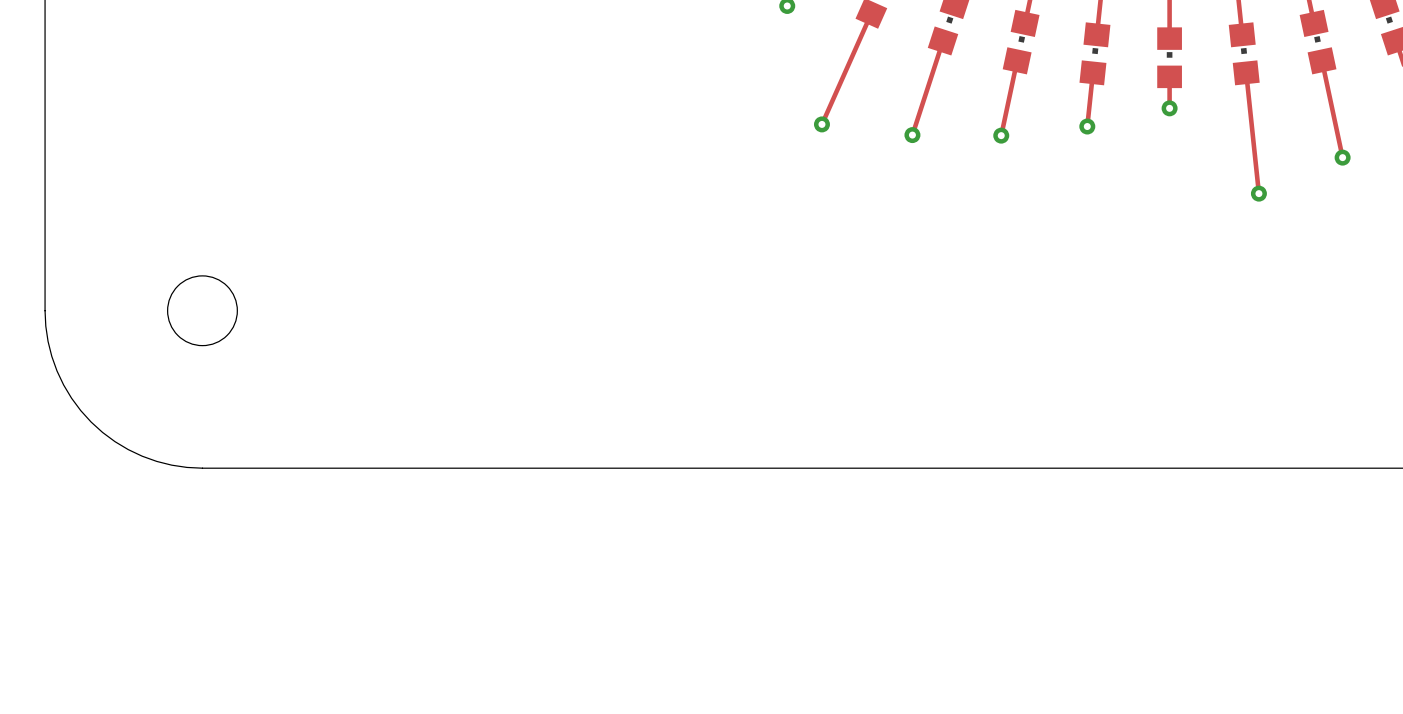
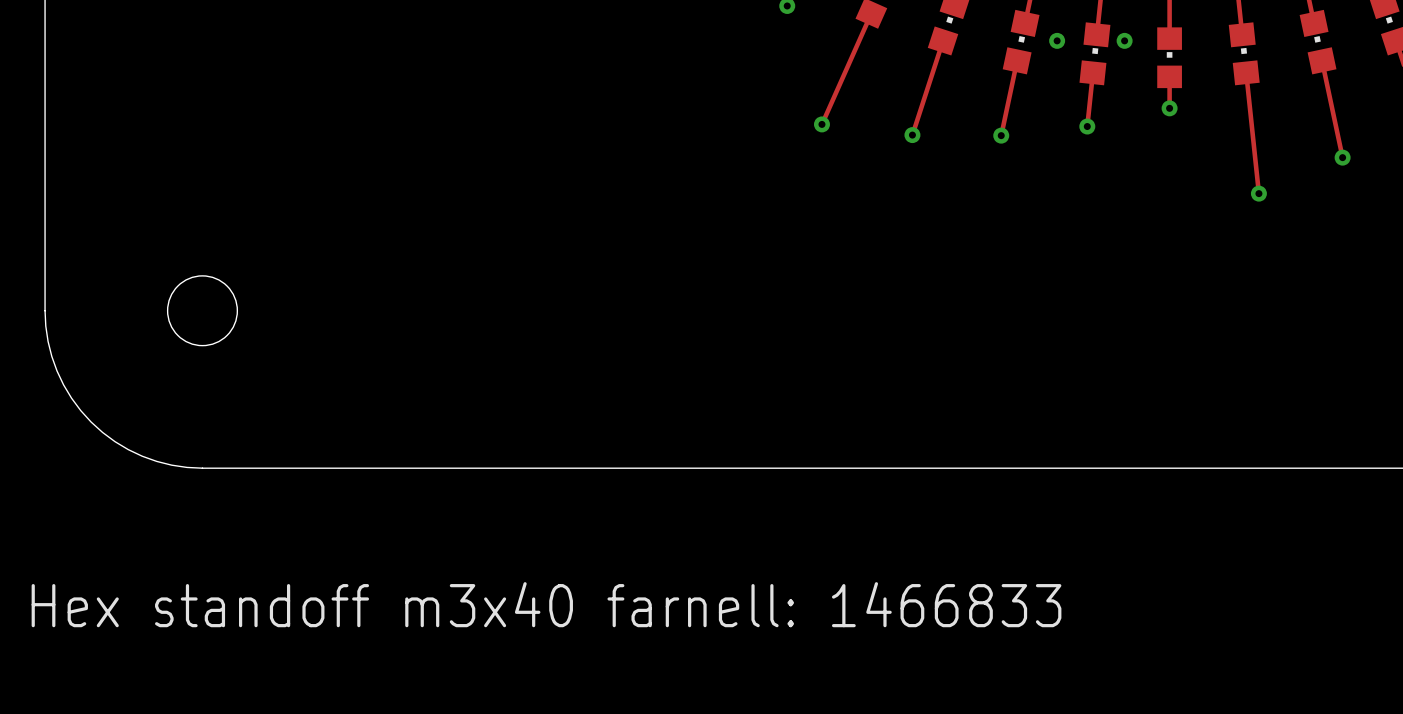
via: none -> (1057, 40)
via: none -> (1124, 40)
text: none -> Hex standoff m3x40 farnell: 1466833 (546, 604)

